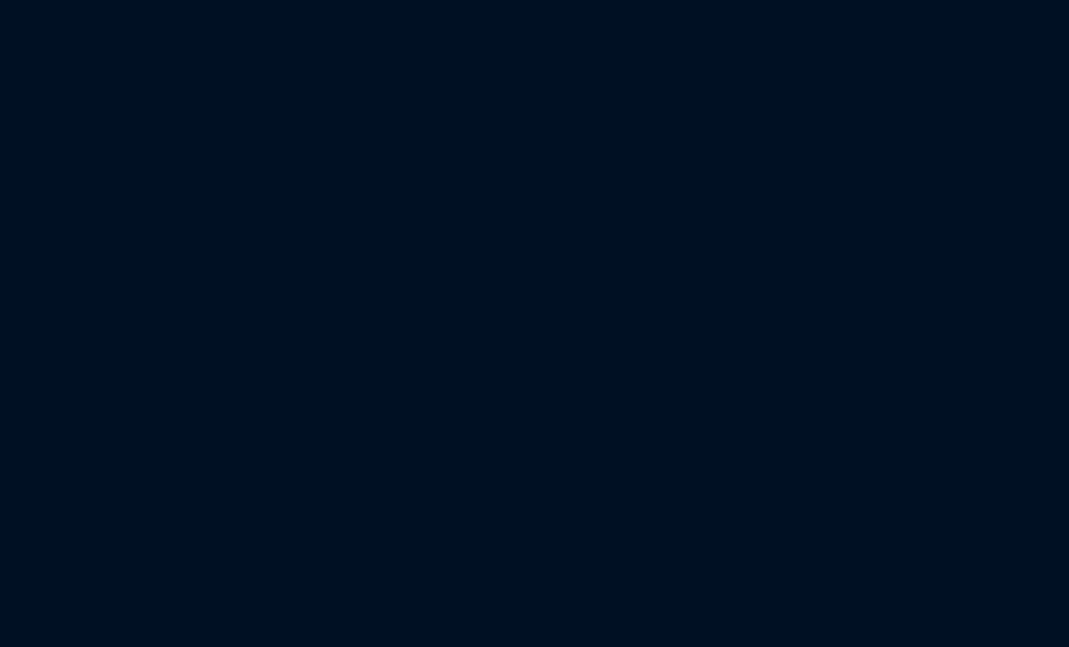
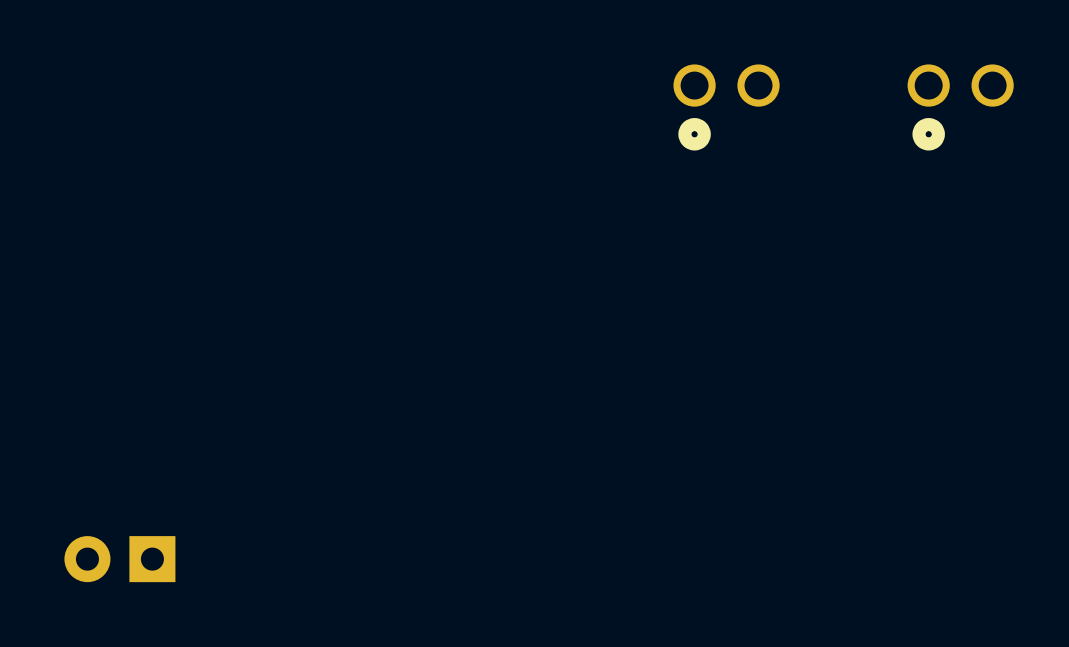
part: none -> (726, 107)
part: none -> (960, 107)
part: none -> (119, 559)

